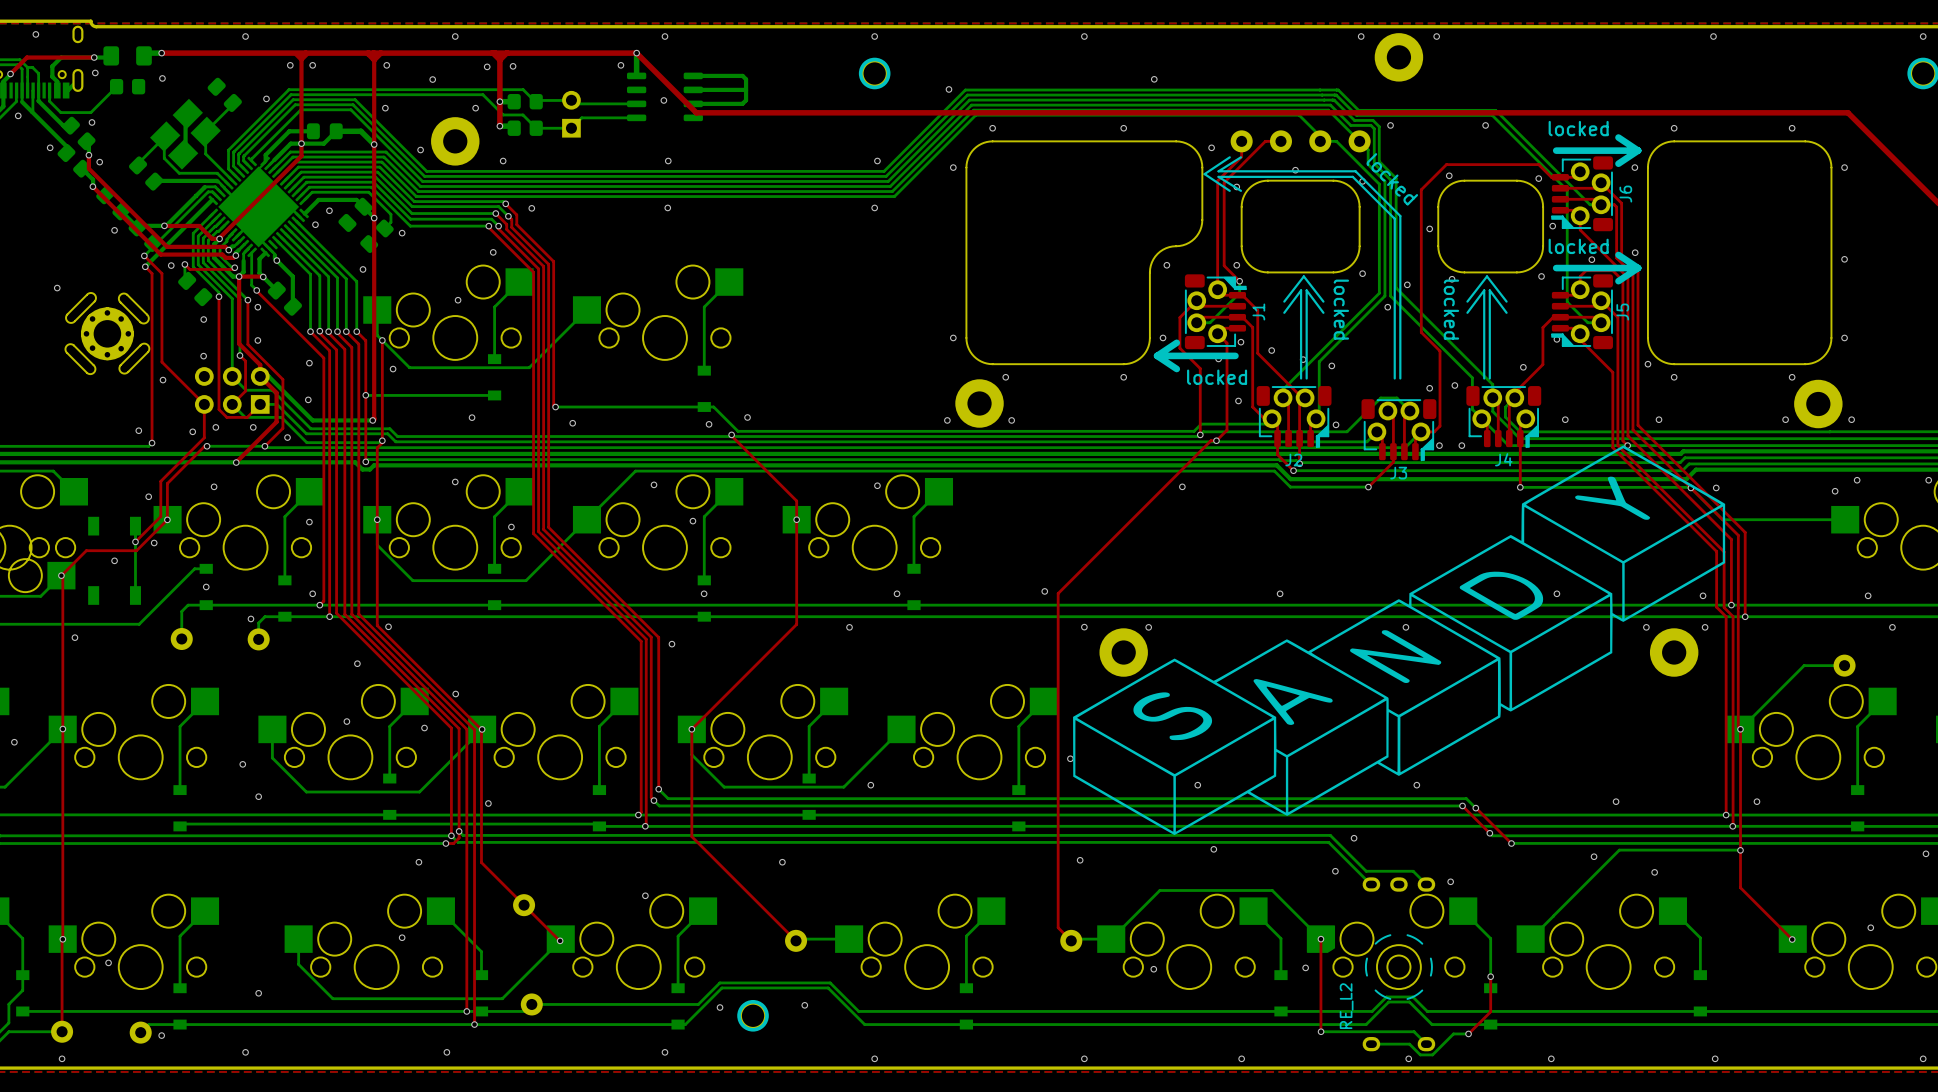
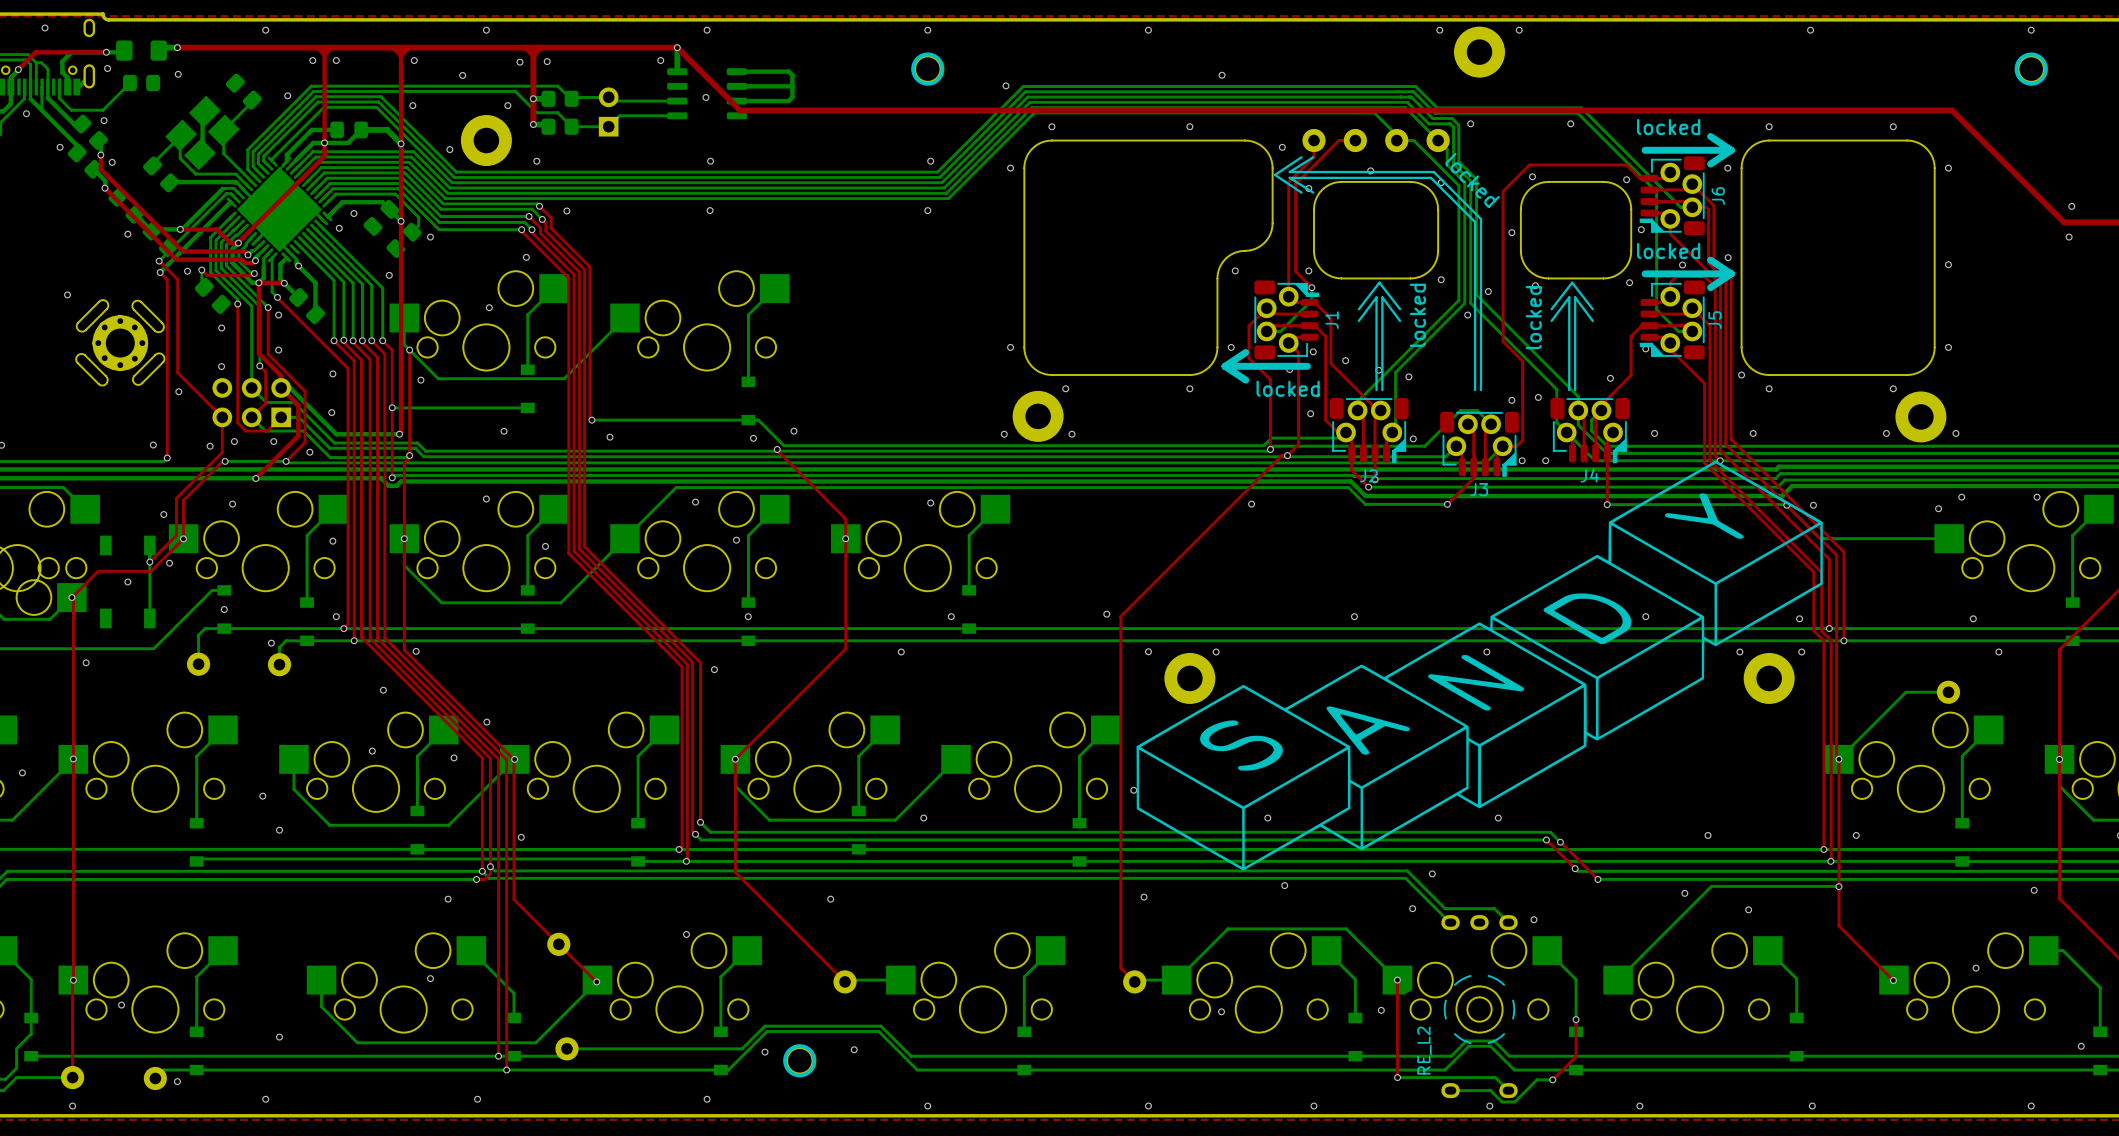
text rotation: 0° (1341, 309) -> 180° (1417, 315)
text rotation: 0° (1451, 309) -> 180° (1533, 317)

